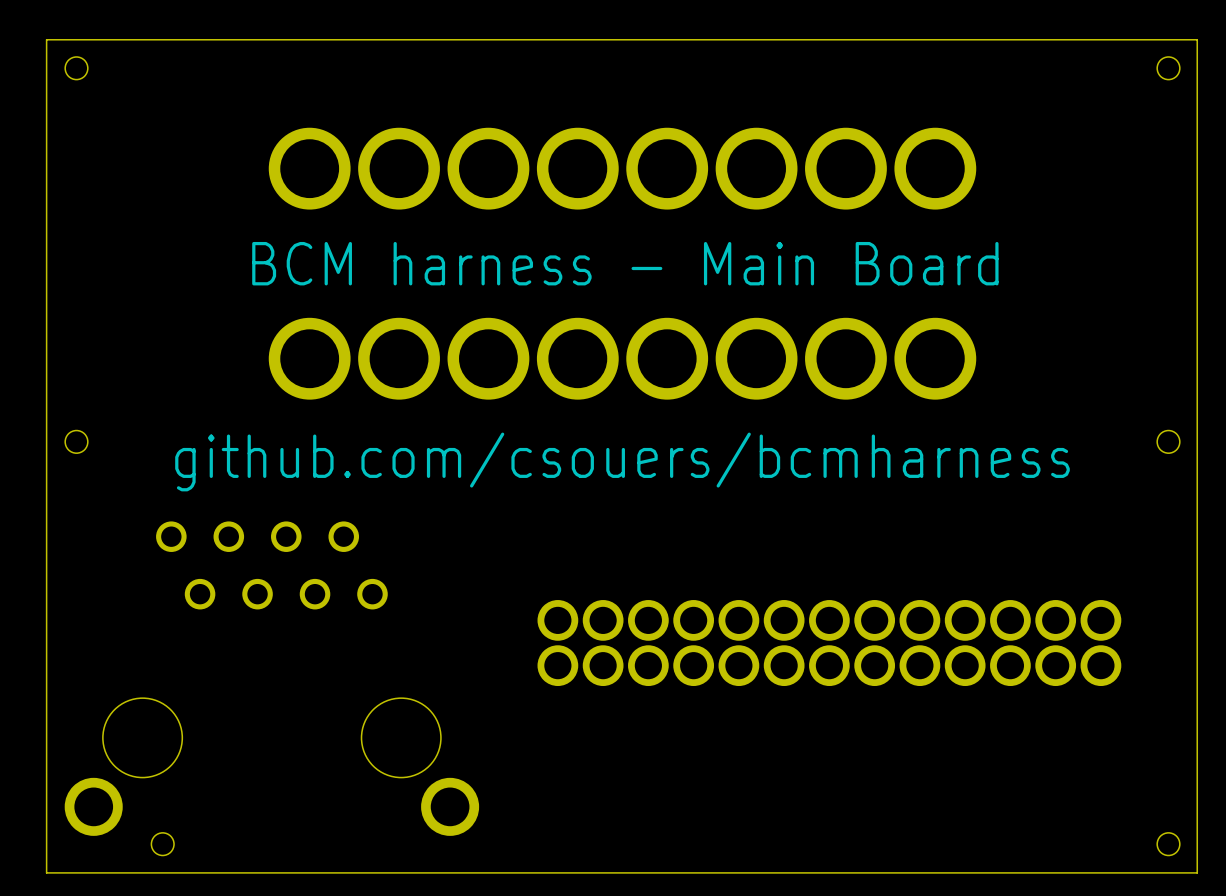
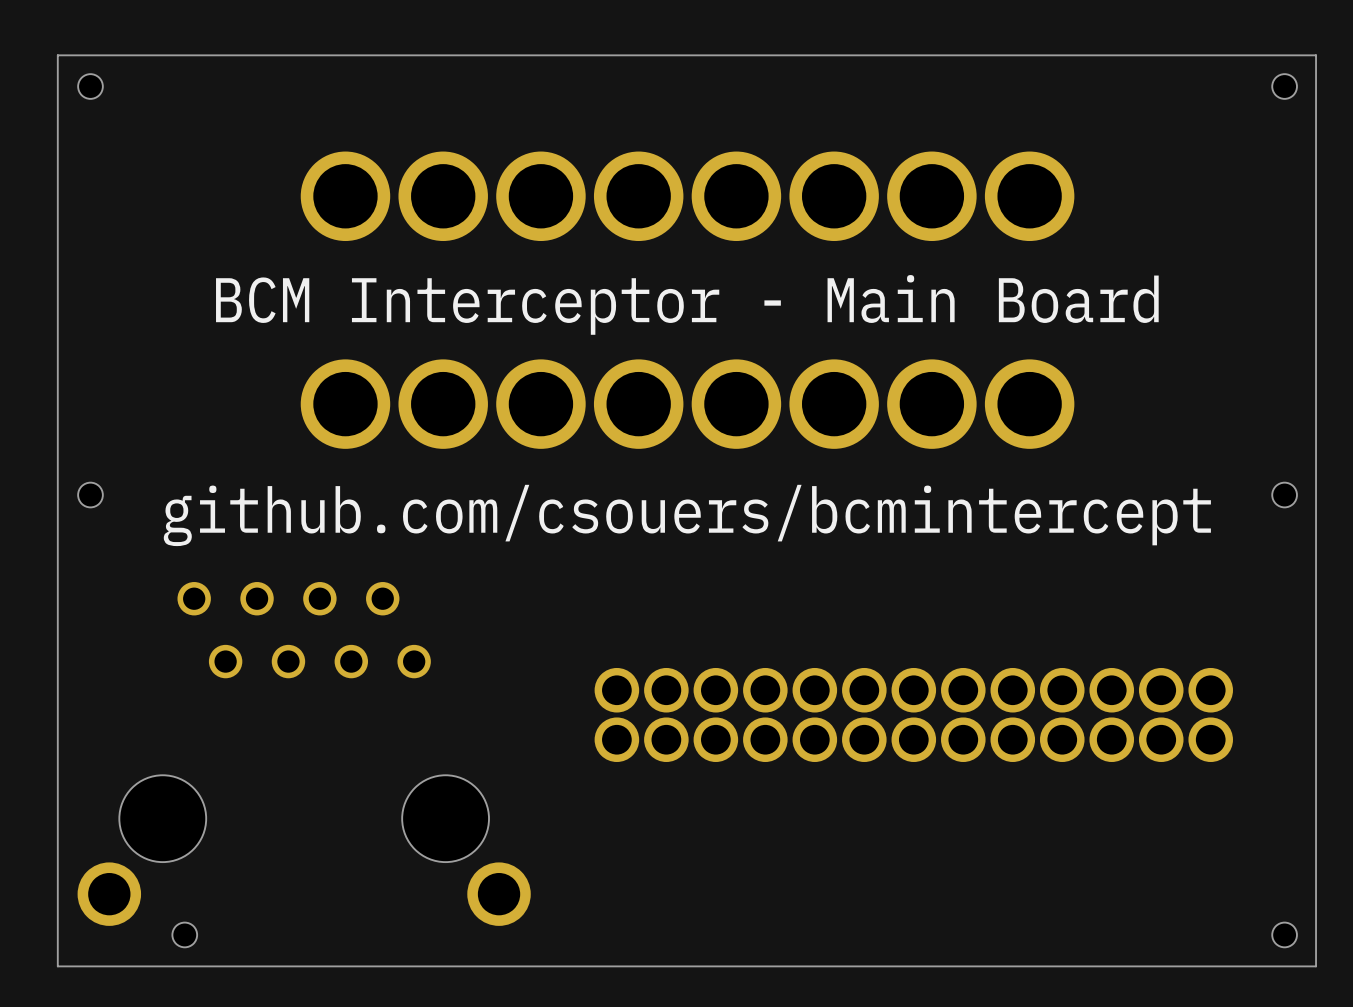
text: BCM harness - Main Board (625, 263) -> BCM Interceptor - Main Board (687, 304)
text: github.com/csouers/bcmharness (622, 461) -> github.com/csouers/bcmintercept (687, 515)

